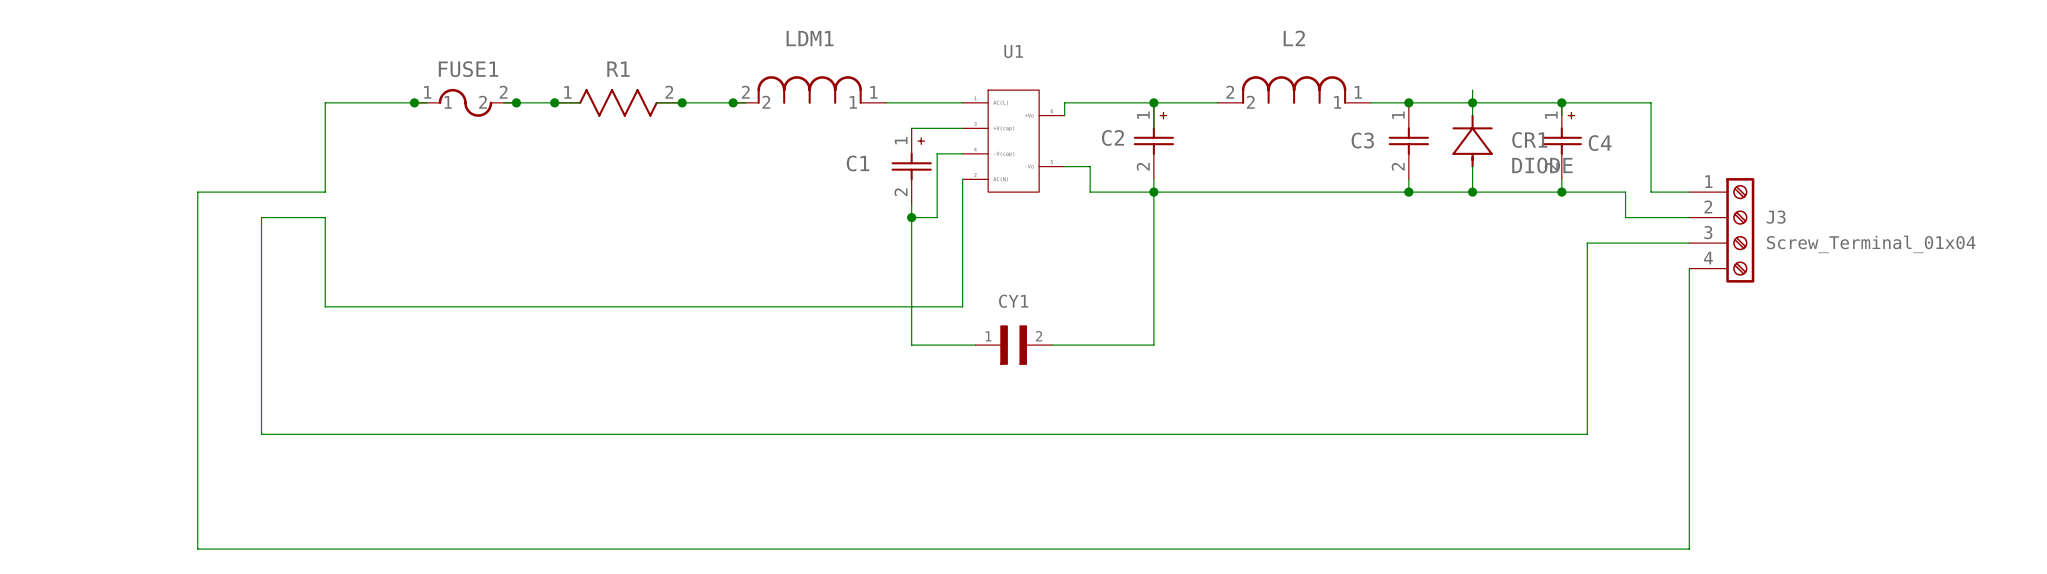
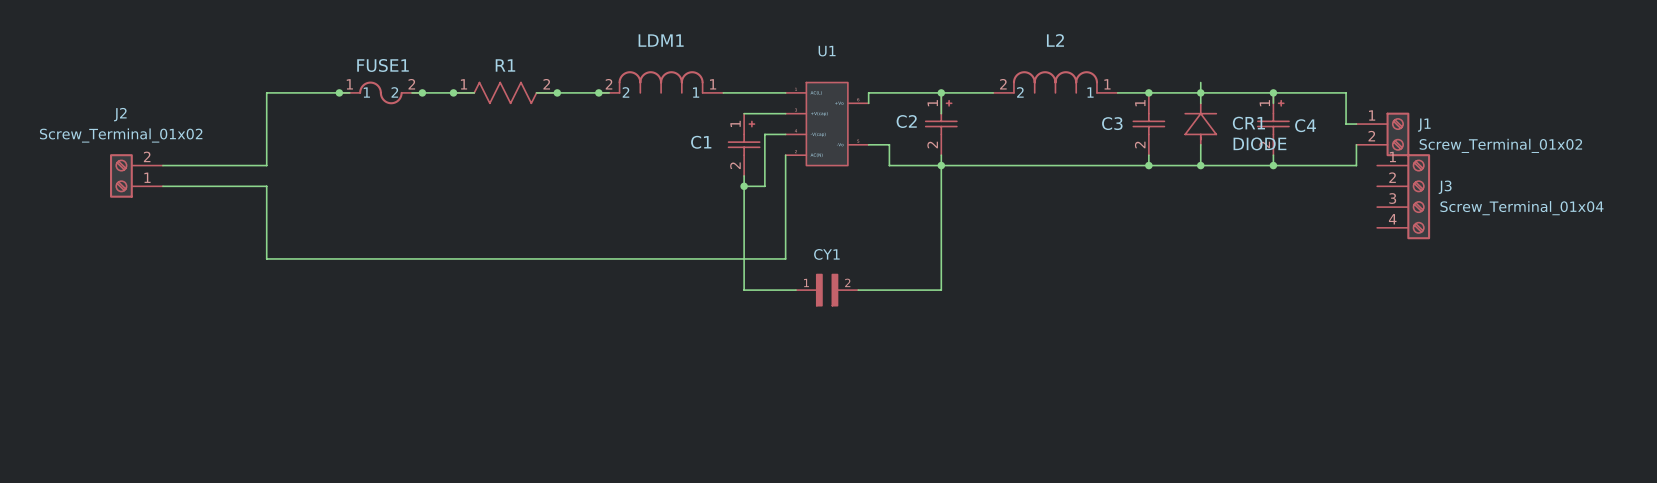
wire: (1651, 141) (1651, 192) -> (1346, 124) (1356, 124)
J1: none -> Screw_Terminal_01x02 (1382, 134)
wire: (197, 192) (197, 549) (1689, 549) (1689, 268) -> none
wire: (1625, 192) (1625, 217) (1689, 217) -> (1325, 165) (1346, 165)
wire: (1663, 192) (1689, 192) -> (1356, 165) (1356, 144)
J2: none -> Screw_Terminal_01x02 (136, 175)
wire: (261, 217) (261, 434) (1587, 434) (1587, 243) (1689, 243) -> (214, 186) (162, 186)

